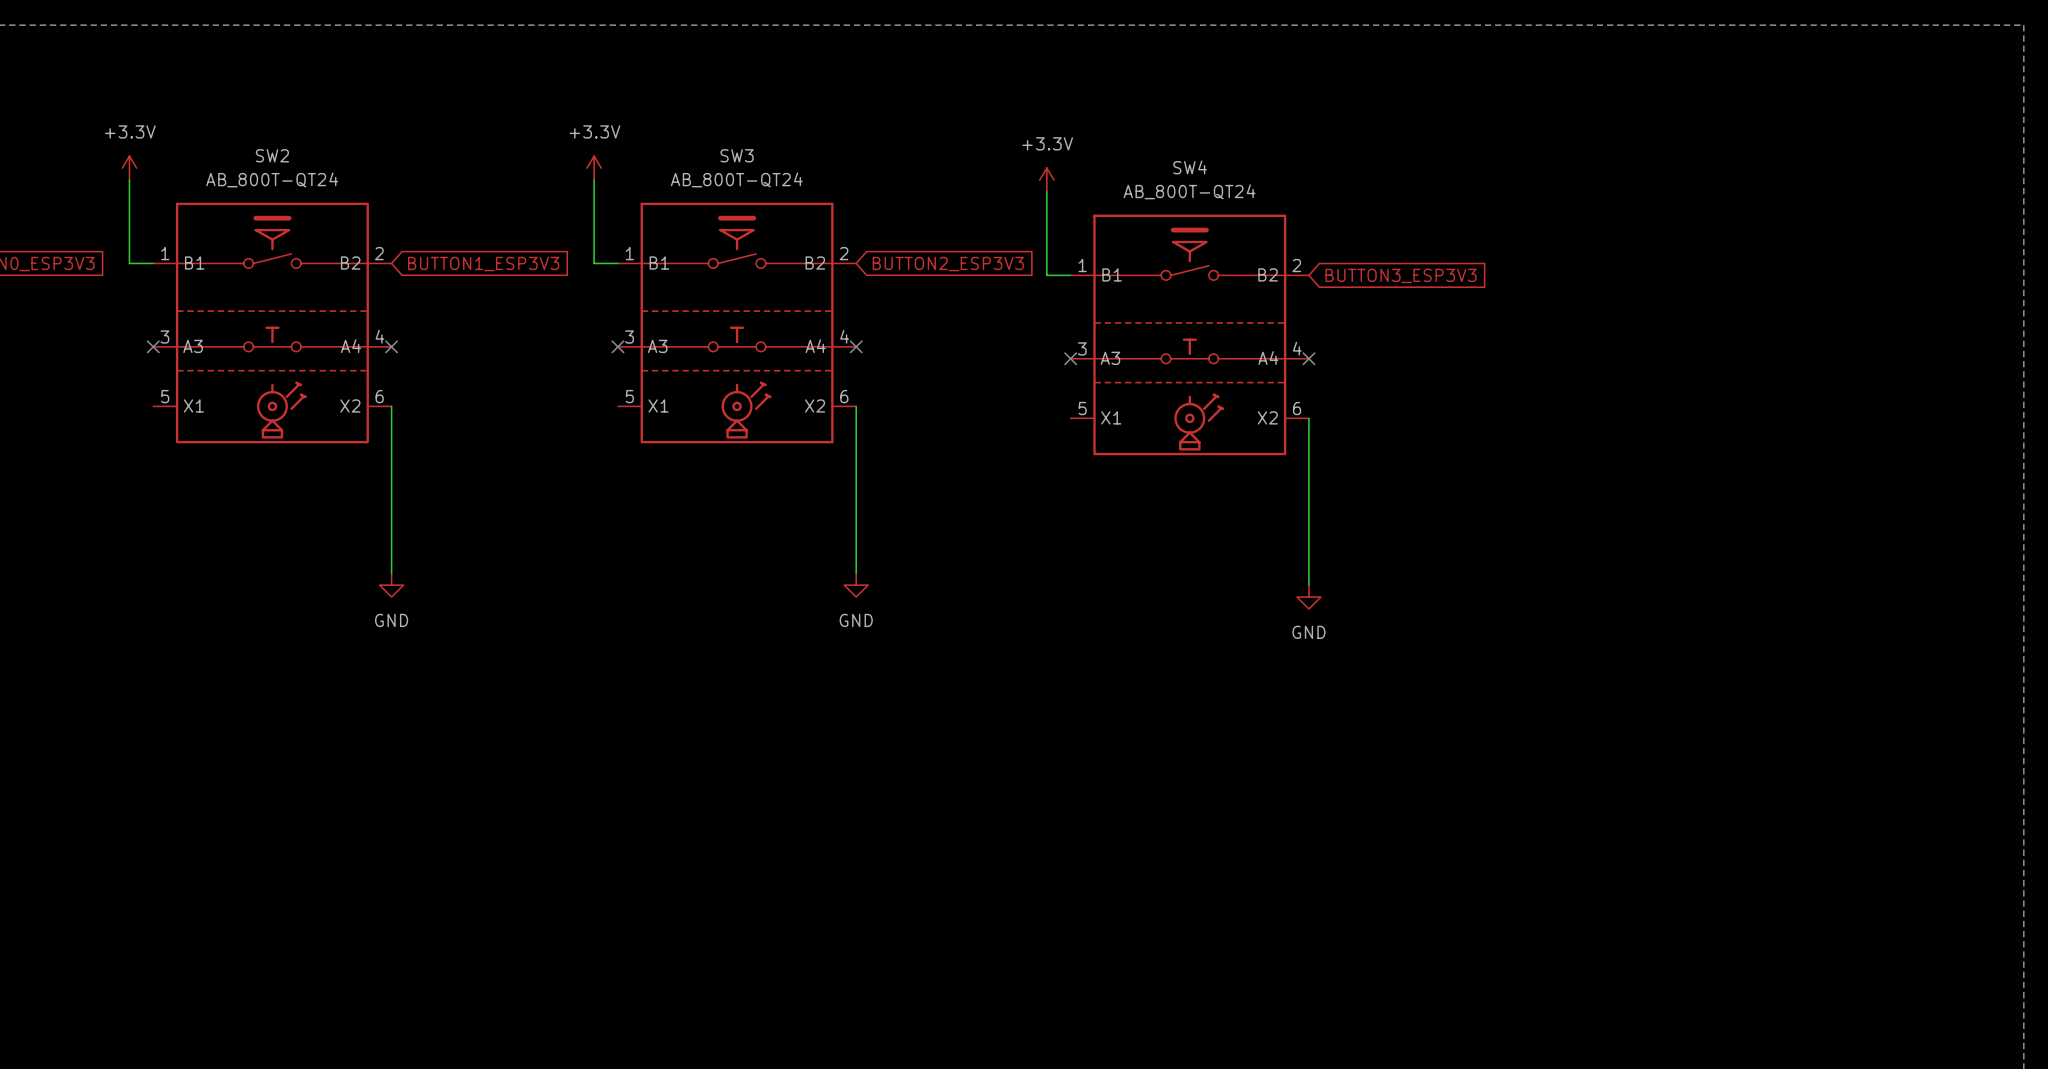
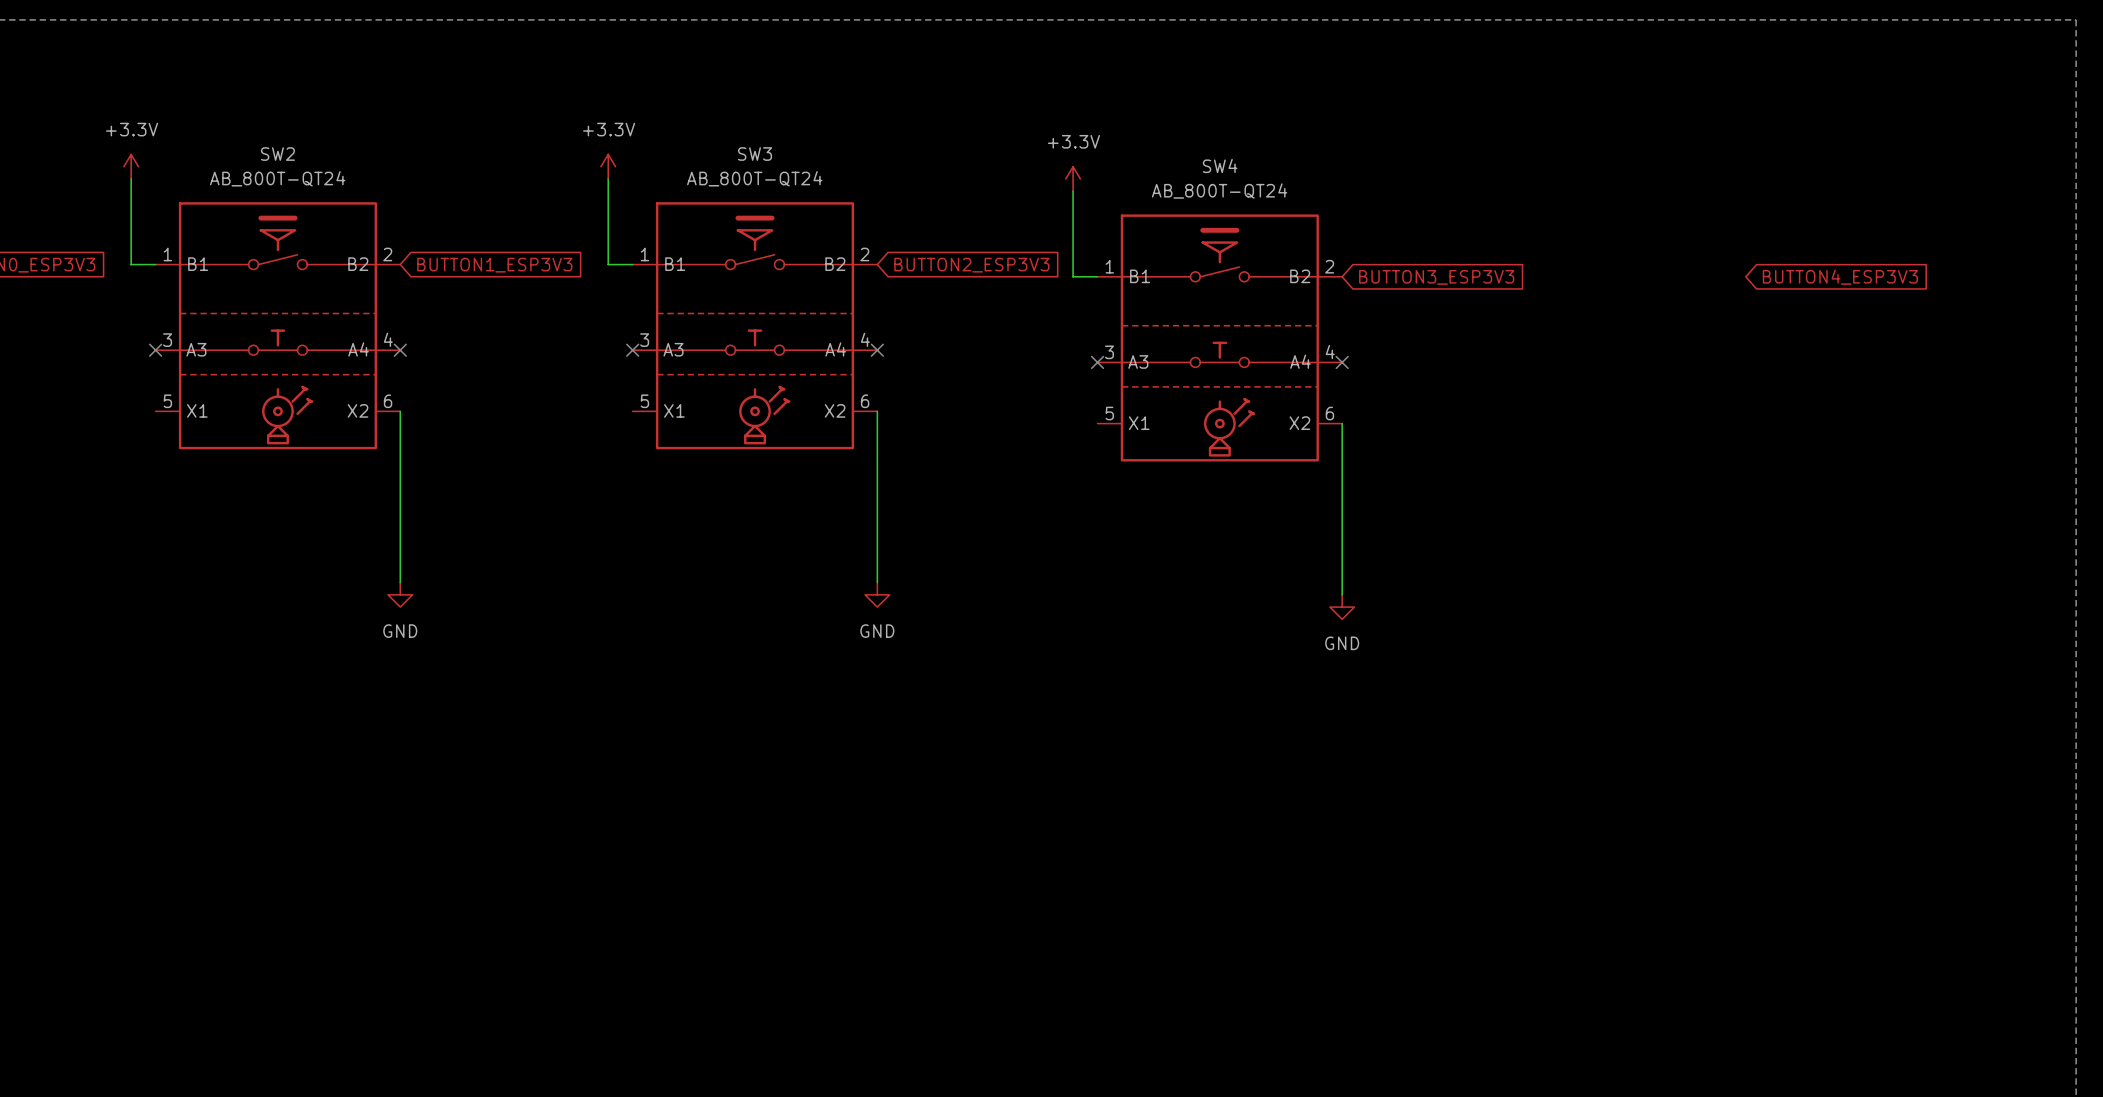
global label: none -> BUTTON4_ESP3V3 (1840, 277)

